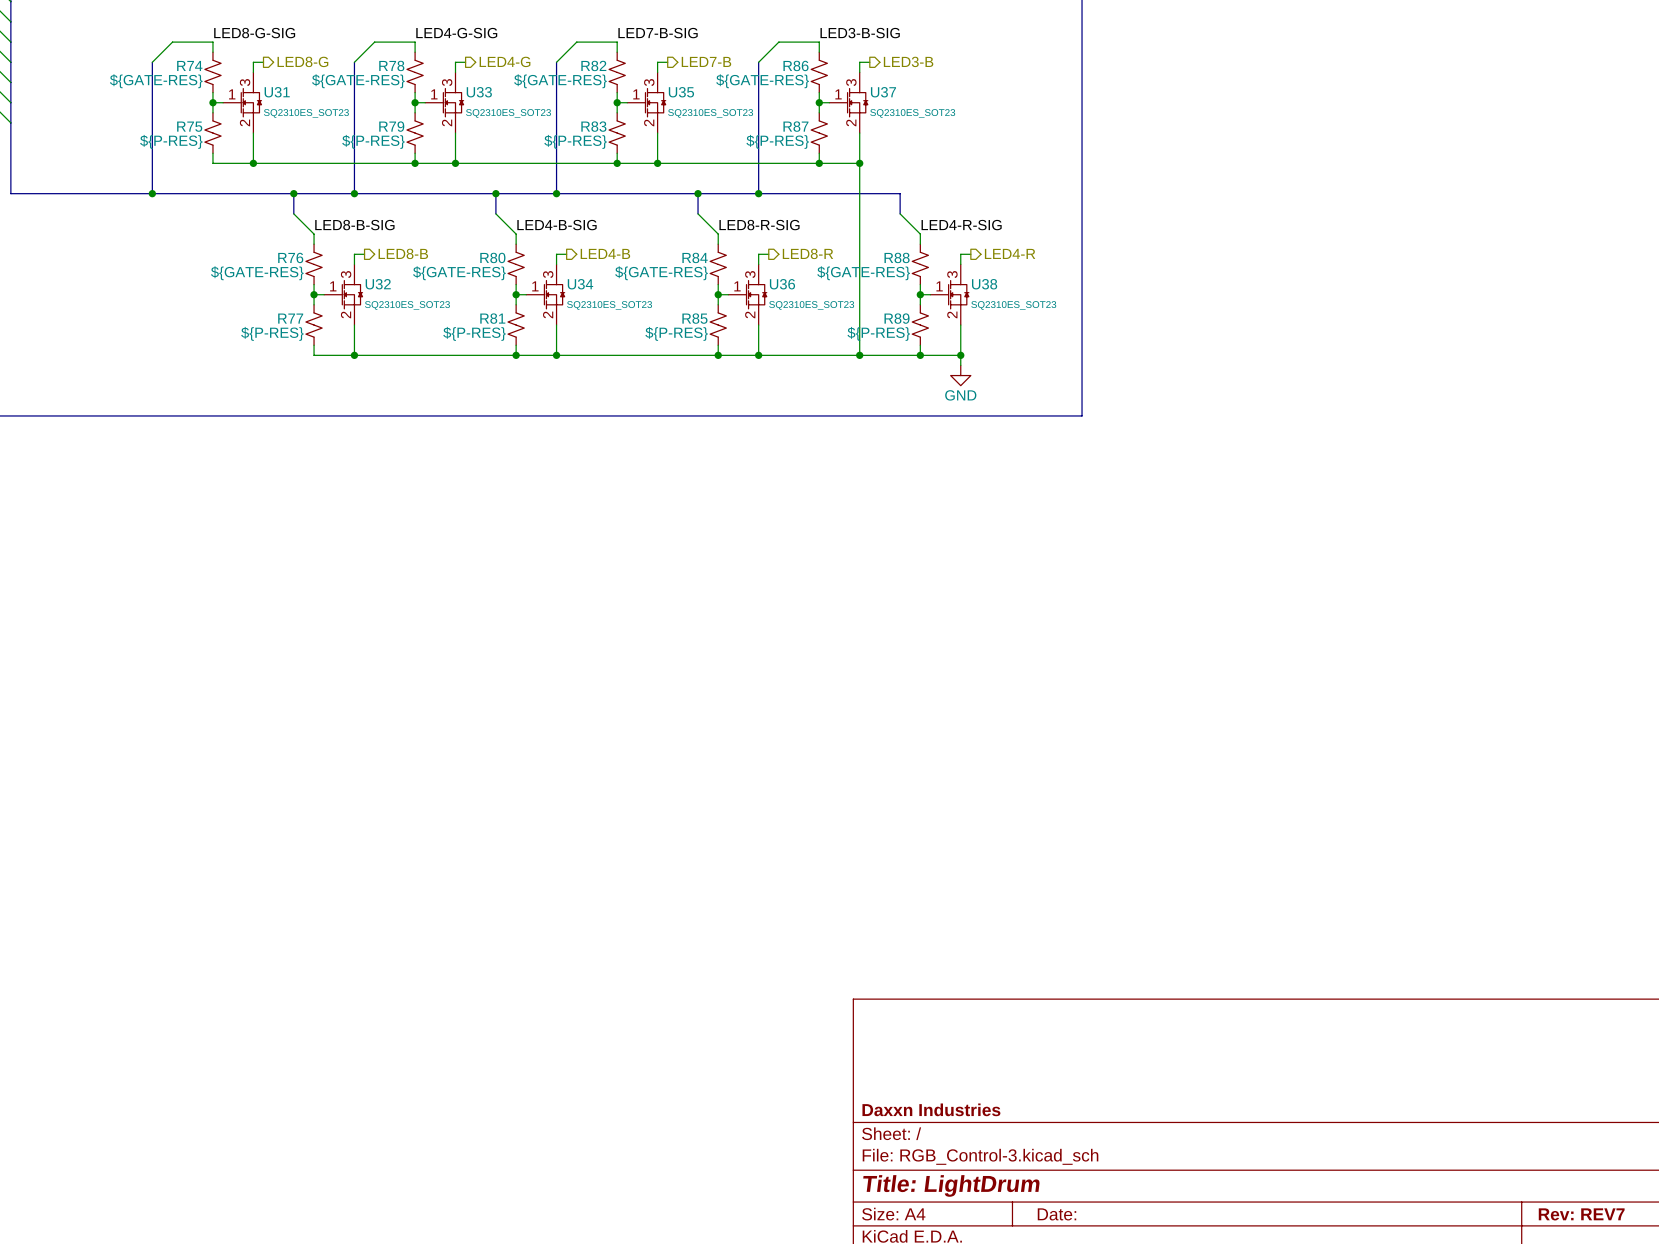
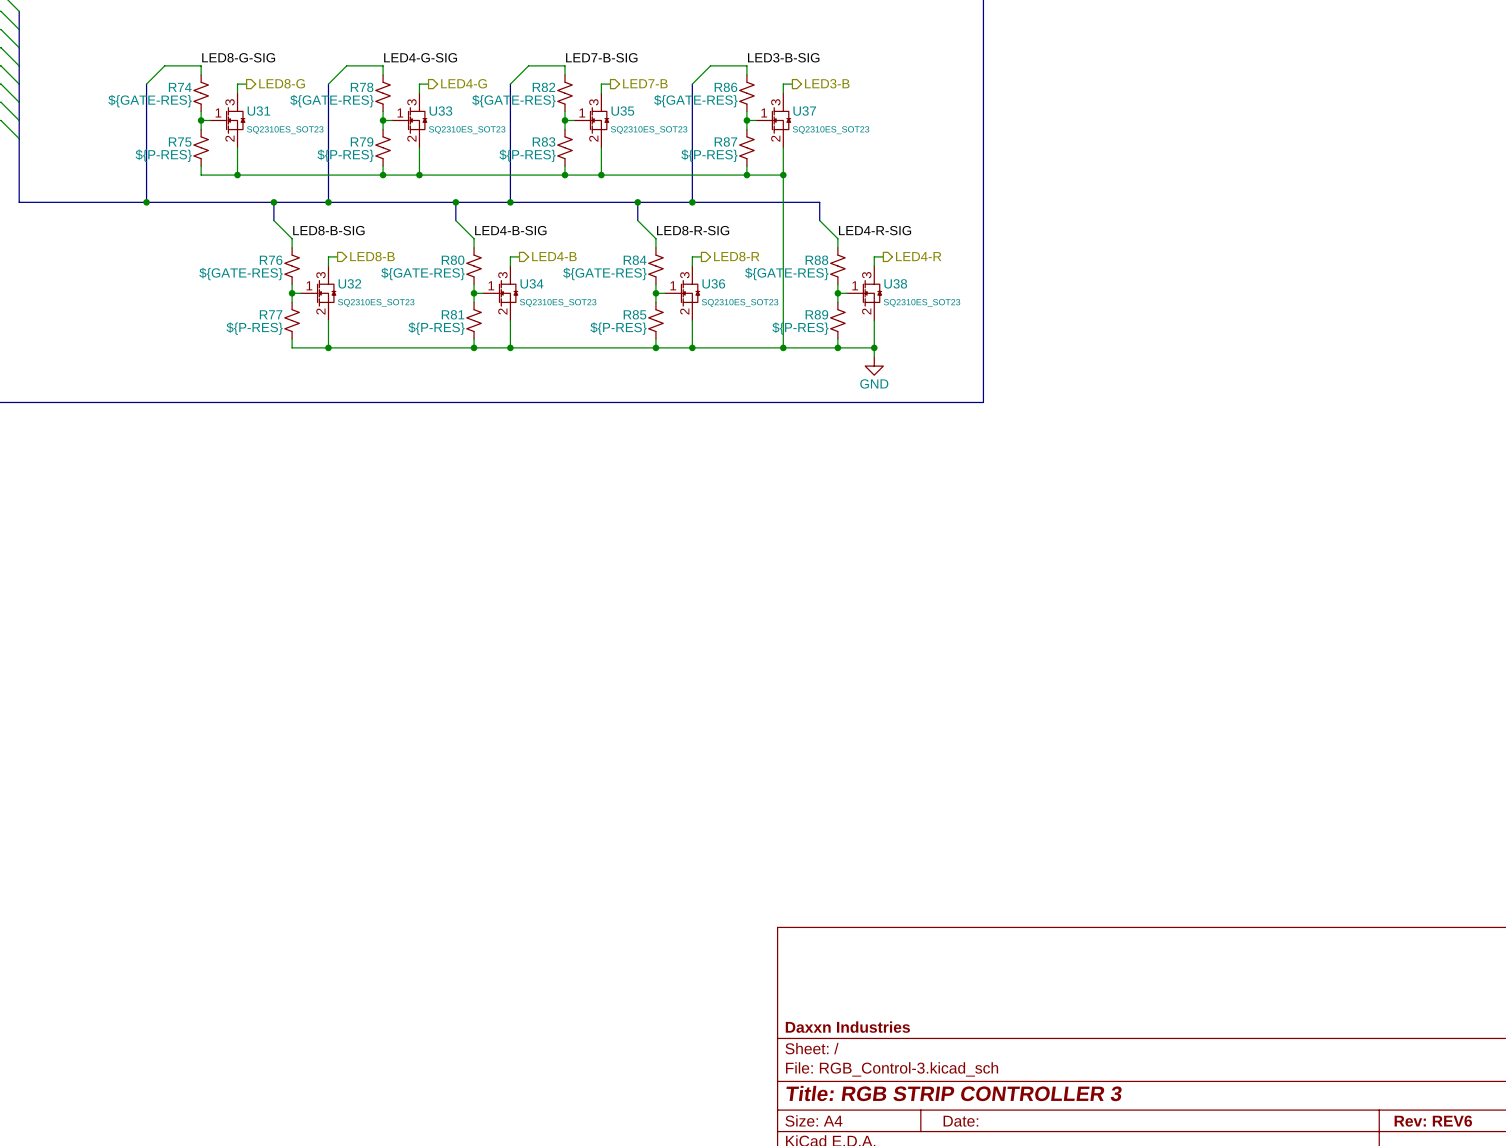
title block: Title: LightDrum (951, 1185) -> Title: RGB STRIP CONTROLLER 3 (954, 1093)
title block: Rev: REV7 (1581, 1214) -> Rev: REV6 (1433, 1121)

